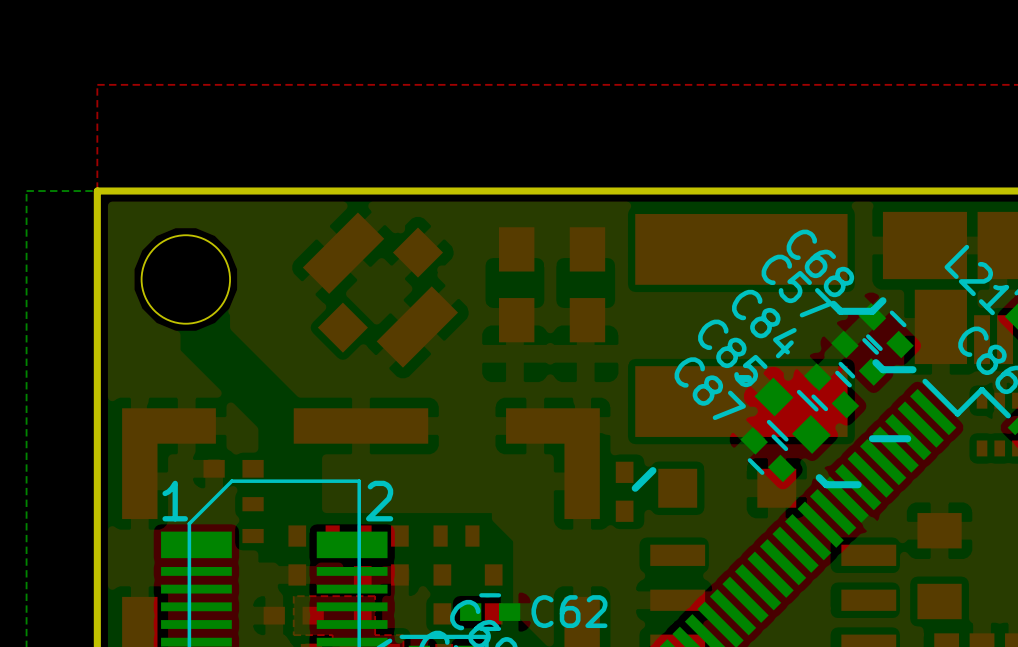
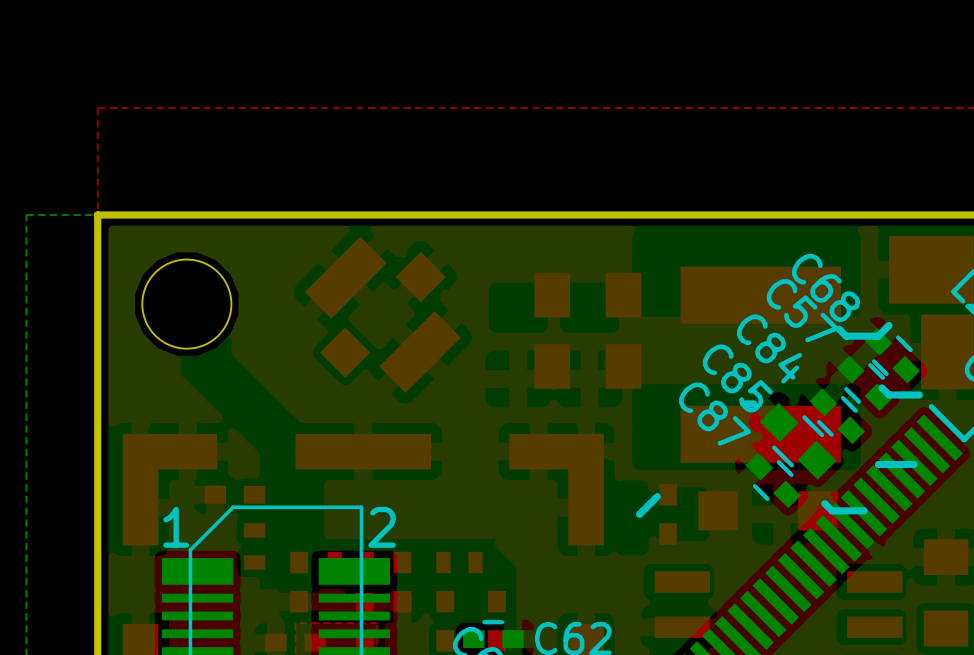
part footprint: [635, 214, 848, 437] -> [680, 266, 841, 463]
part: (552, 249) -> none
part: none -> (587, 295)
part: (552, 320) -> none
part: none -> (587, 366)
part position: (727, 488) -> (767, 510)
part position: (624, 491) -> (668, 514)

